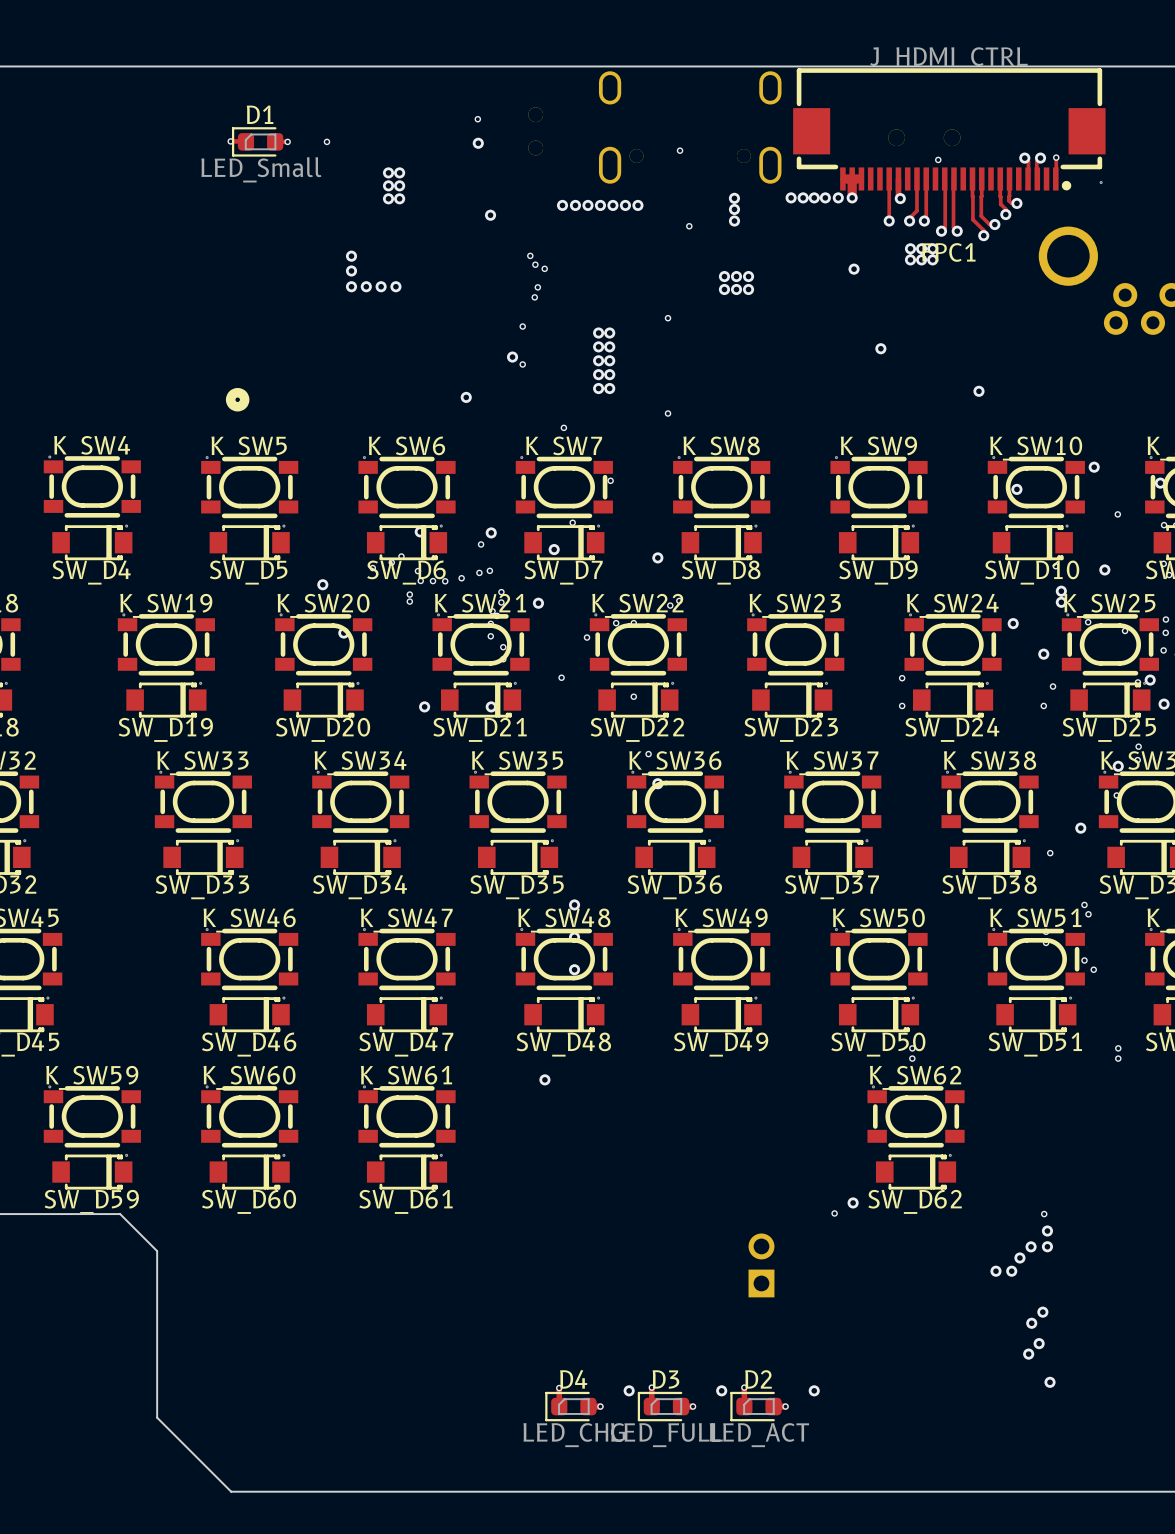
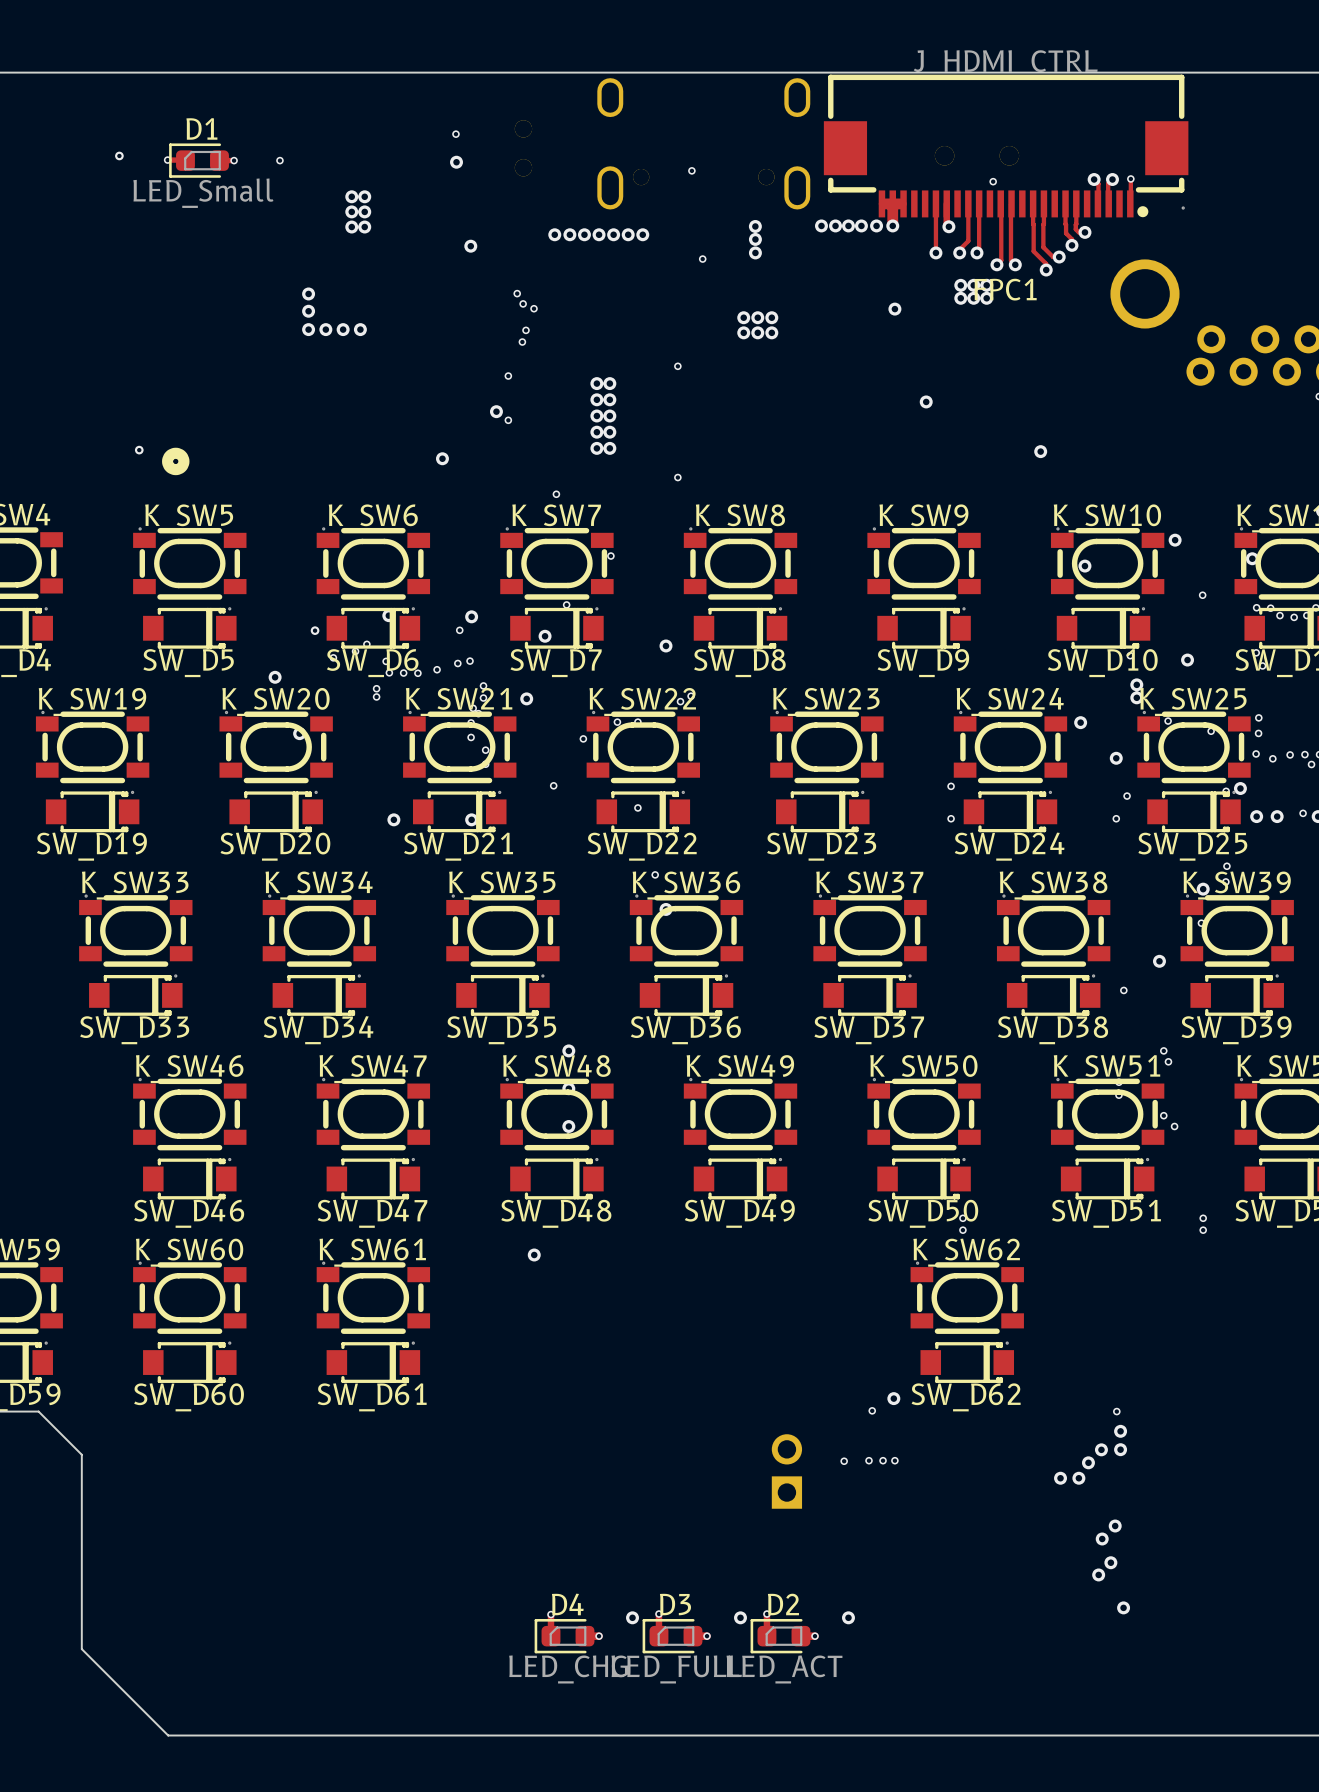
via: none -> (119, 155)
via: none -> (139, 450)
via: none -> (315, 630)
via: none -> (844, 1461)
via: none -> (868, 1460)
via: none -> (883, 1460)
via: none -> (894, 1460)

